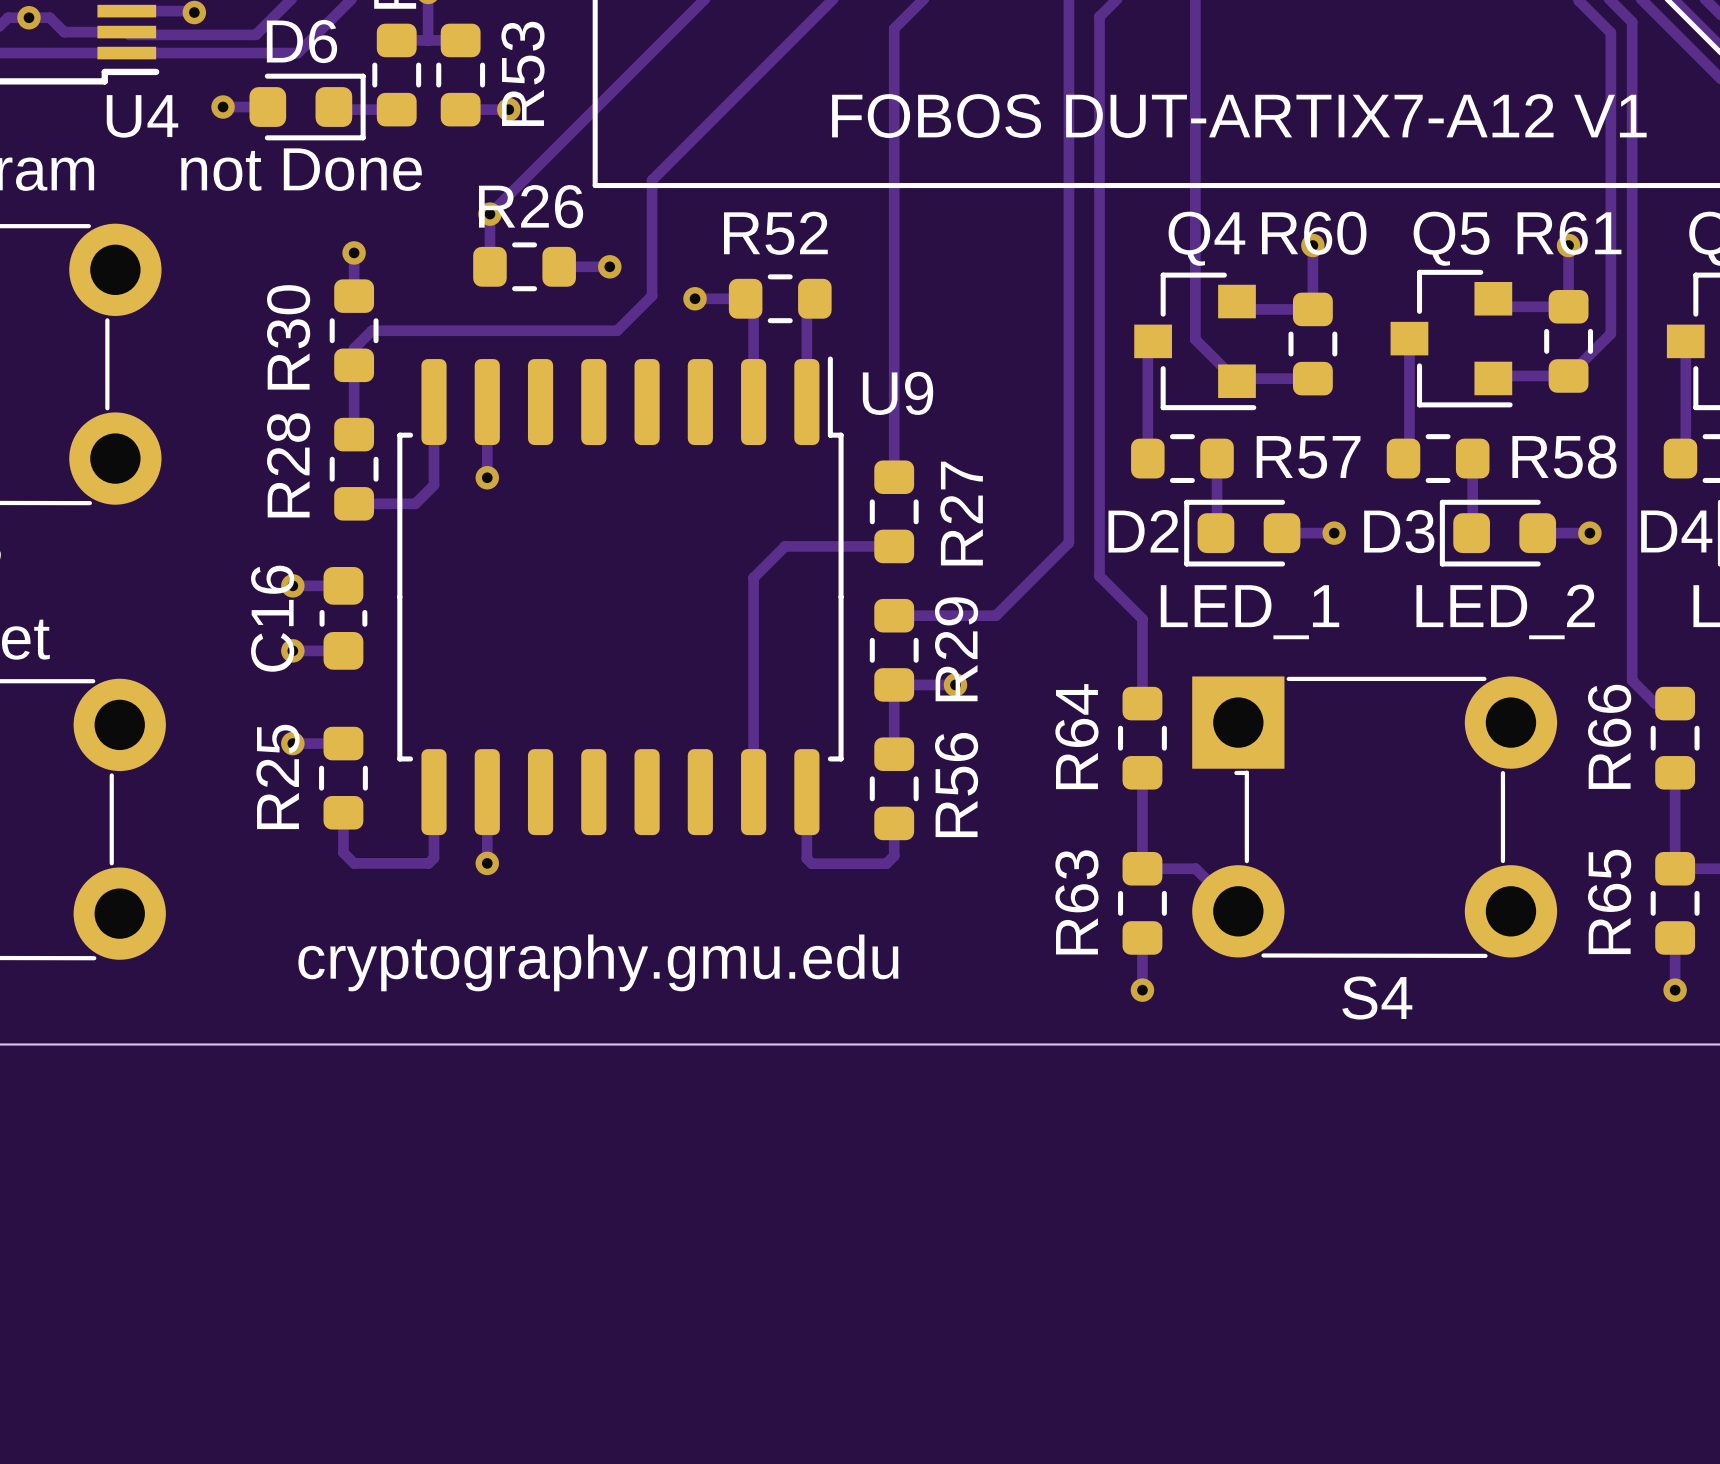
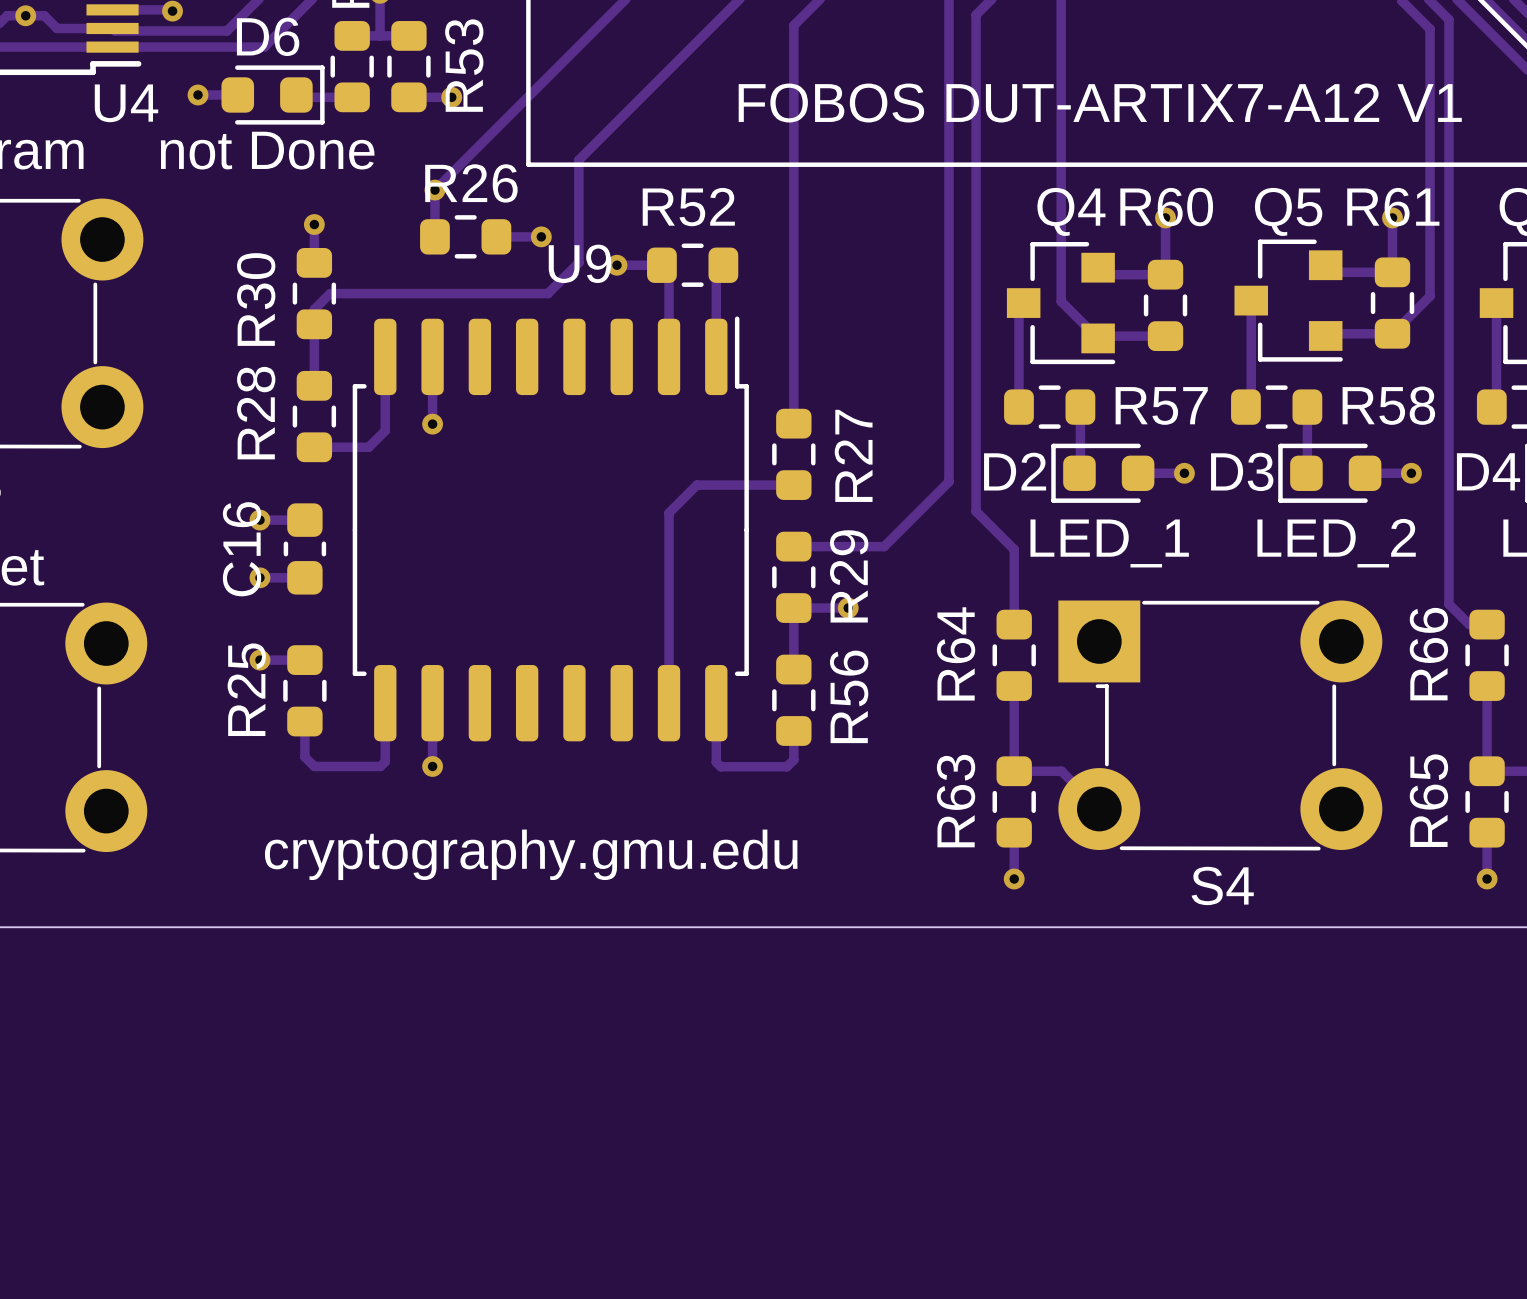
U9 name position: U9 (898, 393) -> U9 (579, 263)

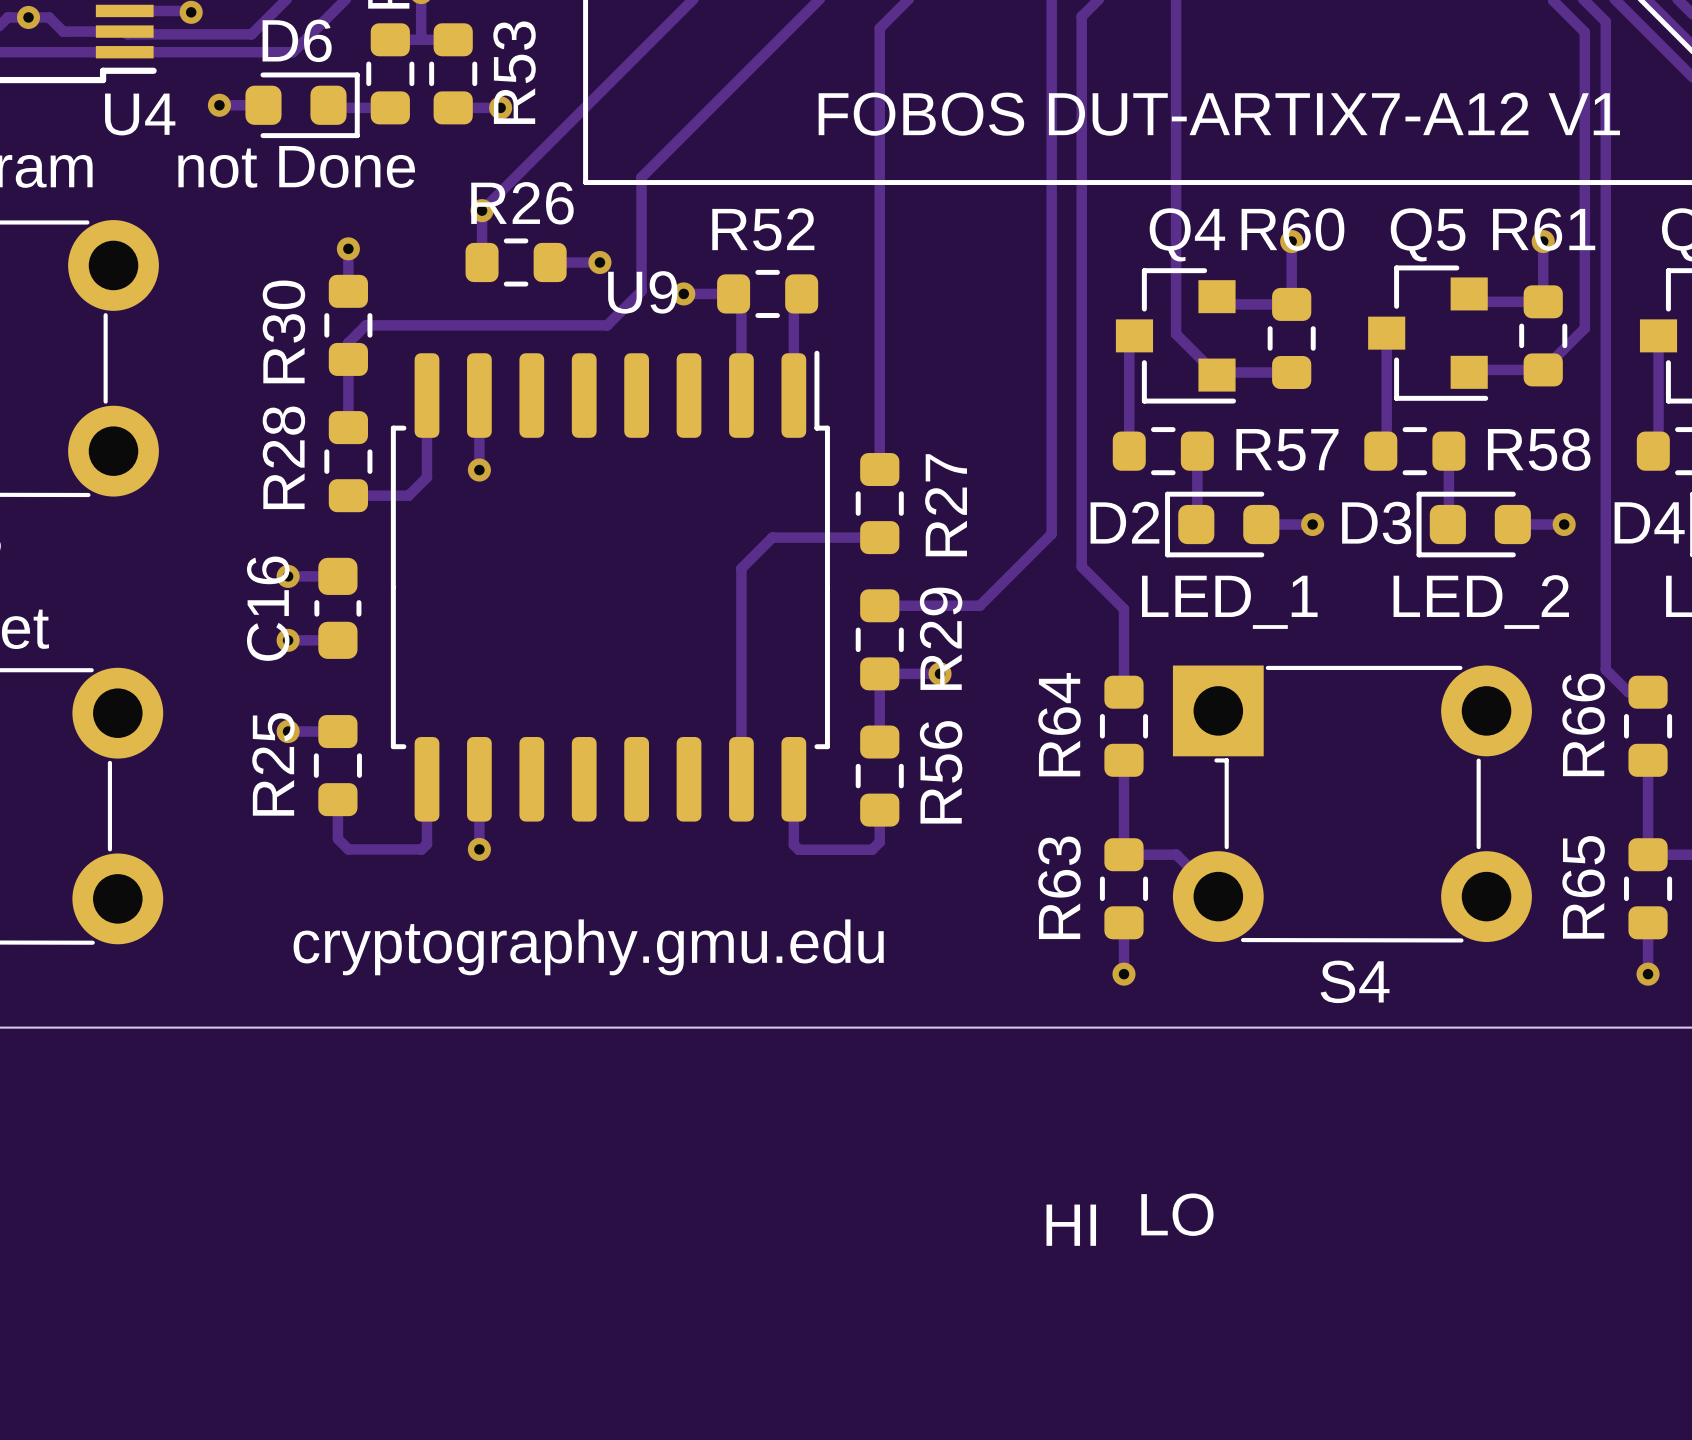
text: none -> LO (1177, 1214)
text: none -> HI (1071, 1225)

